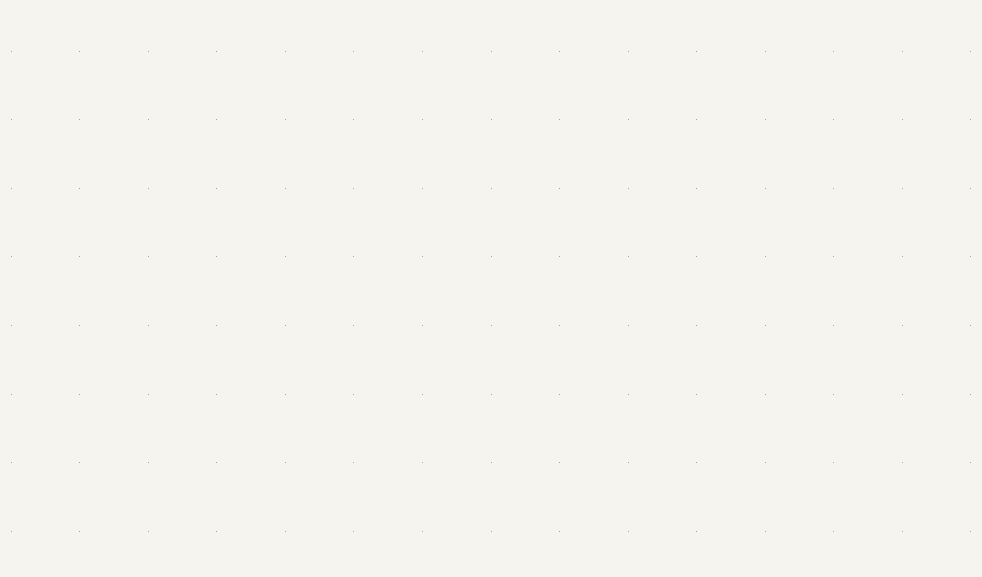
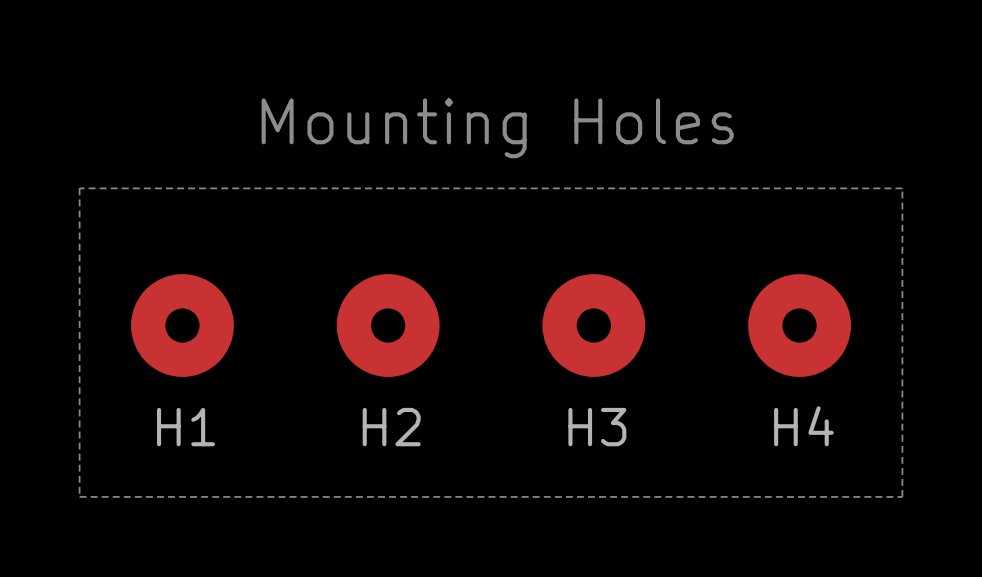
text: none -> Mounting Holes (497, 128)
line: none -> (79, 188) (79, 496) (902, 496) (902, 188) (79, 188)
H1: none -> (182, 325)
H2: none -> (388, 325)
H3: none -> (593, 325)
H4: none -> (799, 325)

